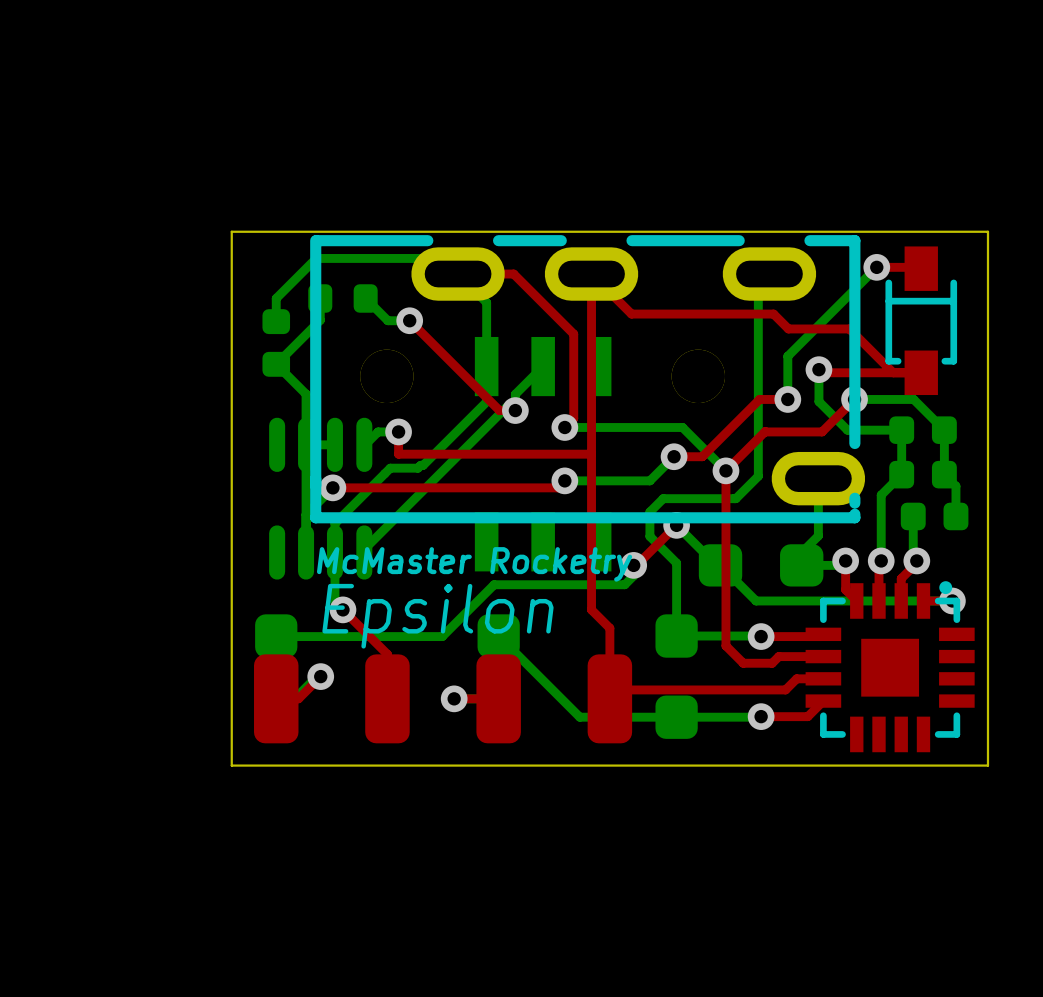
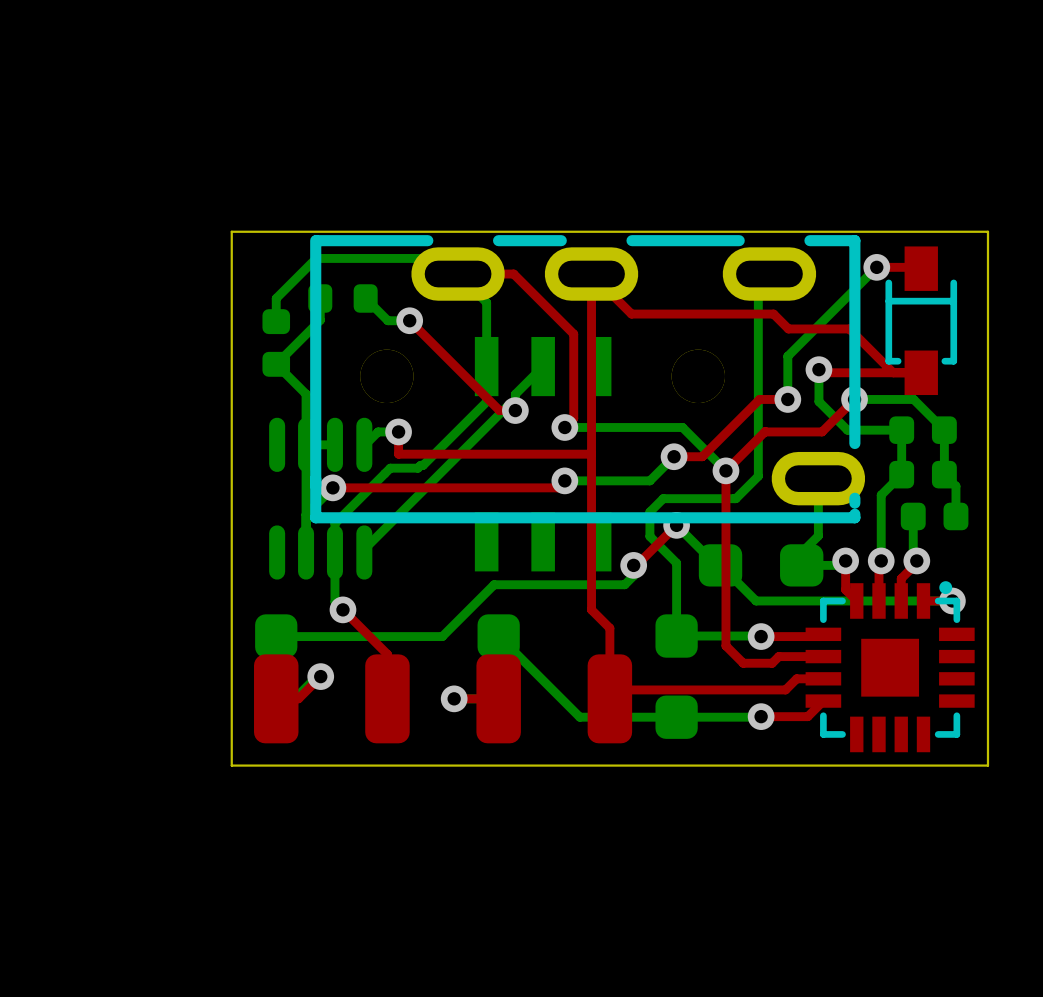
text: McMaster Rocketry (474, 564) -> none
text: Epsilon (437, 616) -> none

